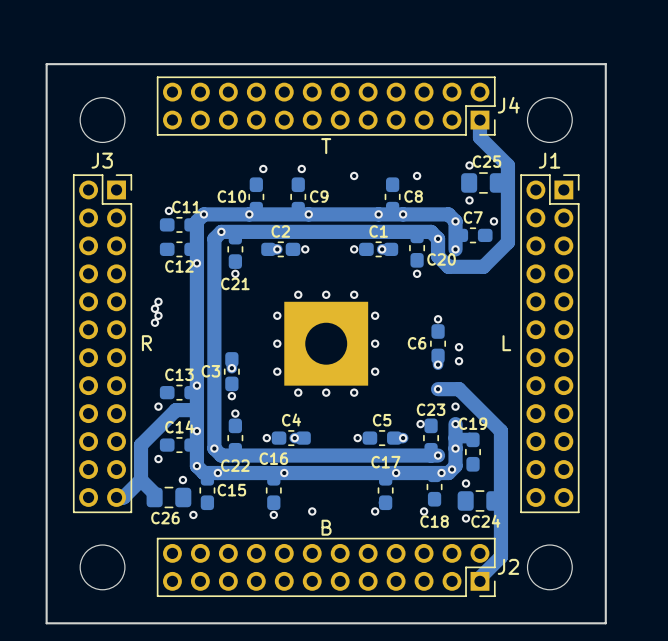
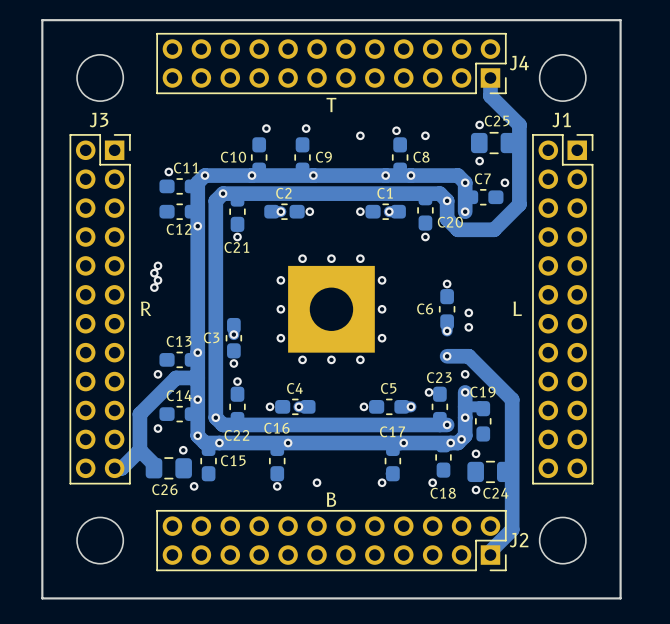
via: none -> (396, 130)

